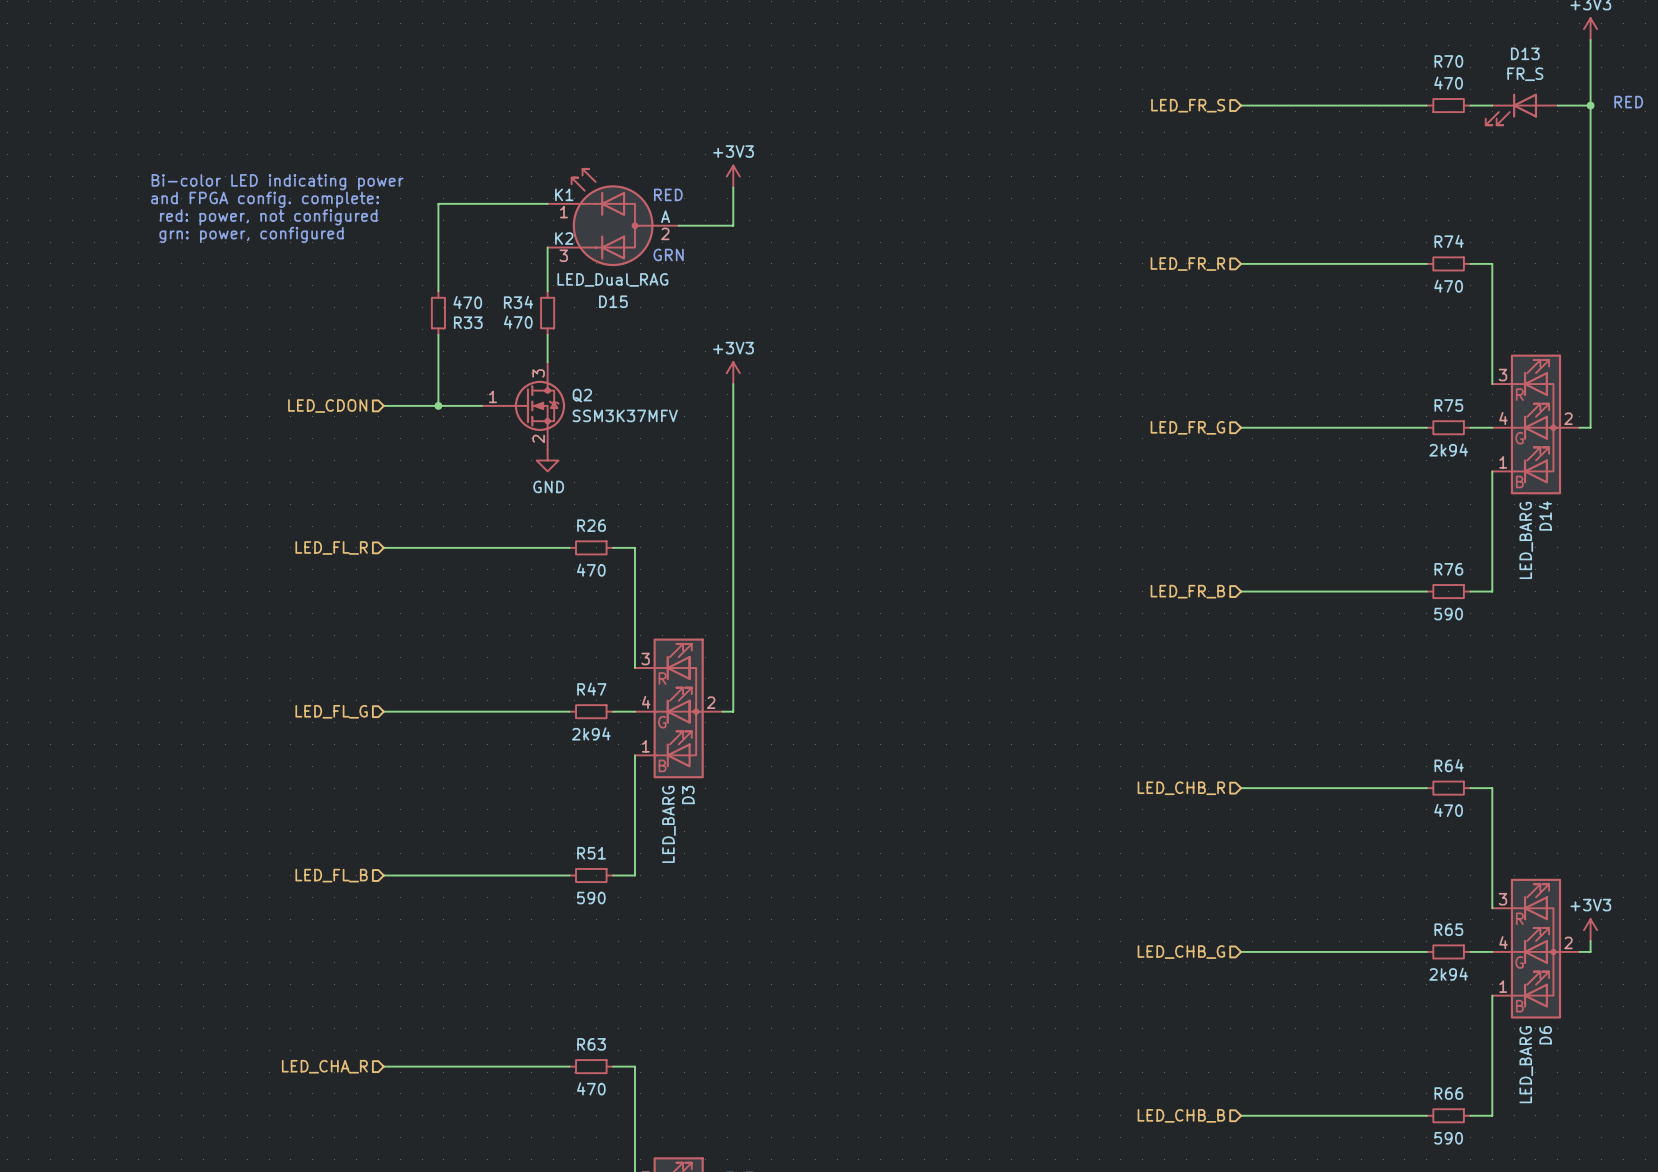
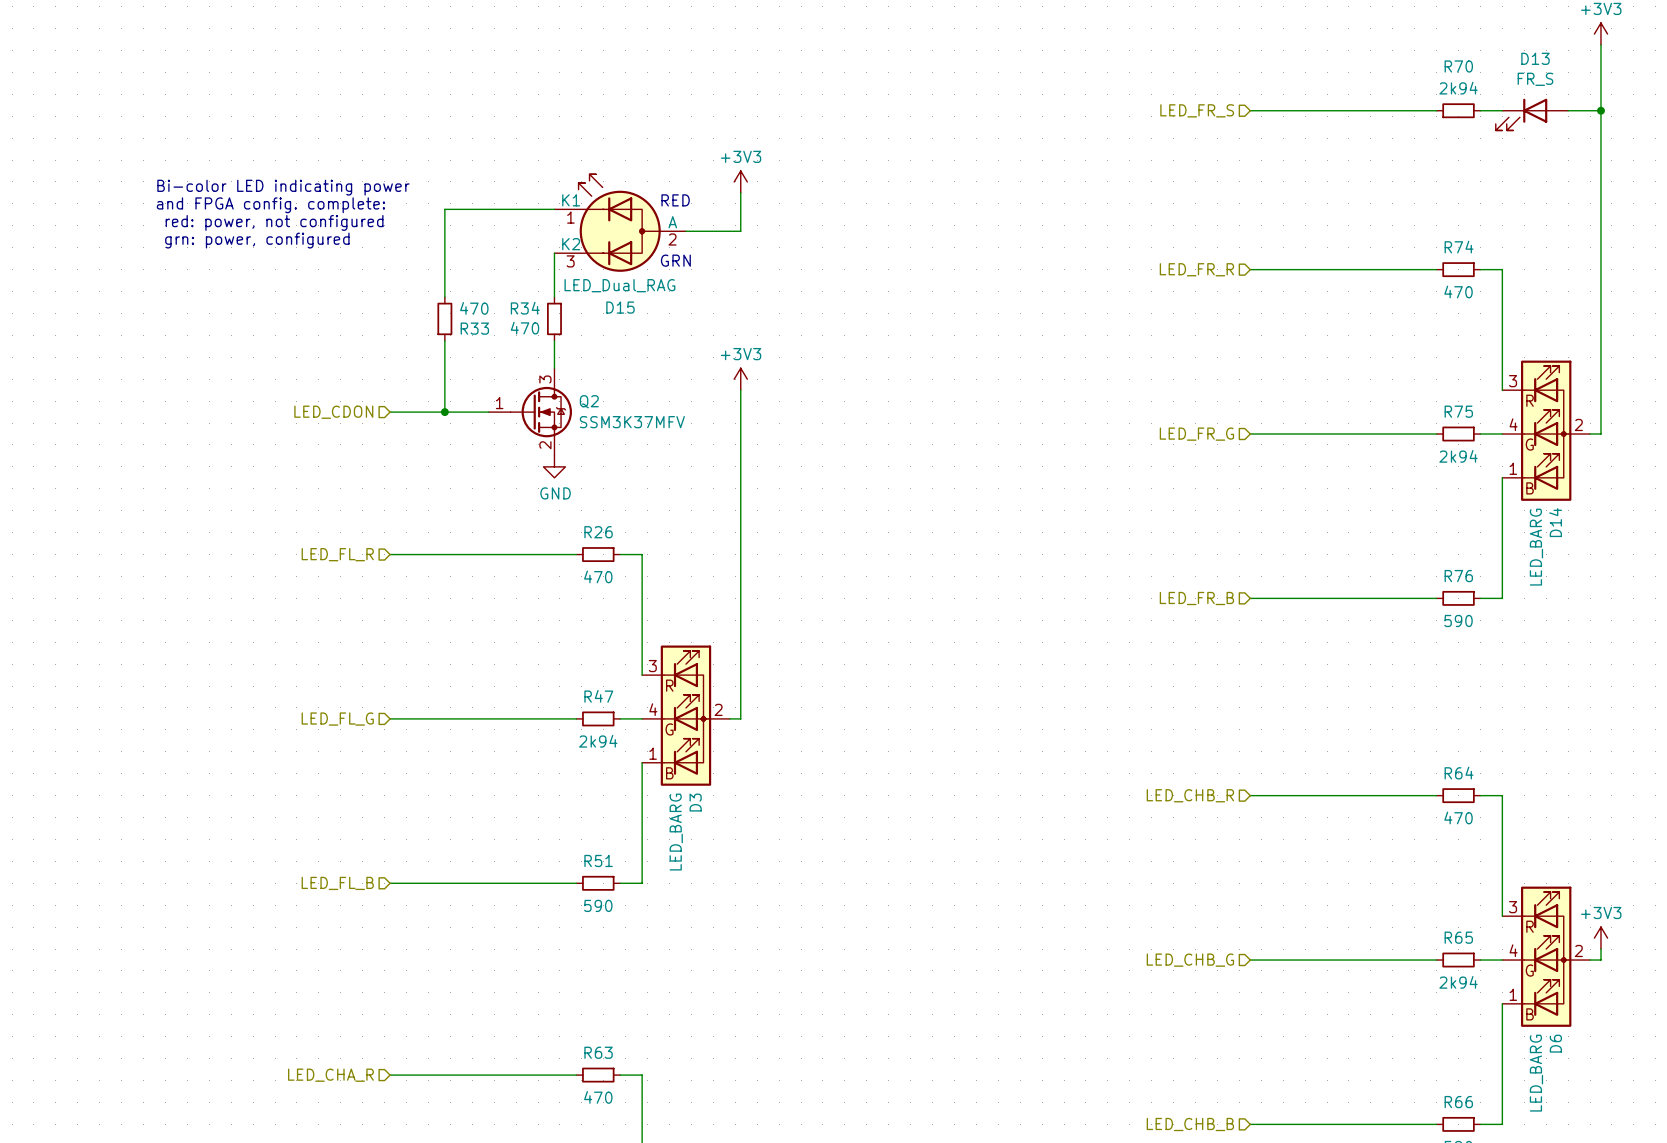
R70 value: 470 (1448, 83) -> 2k94 (1458, 88)
text: RED (1628, 102) -> none

